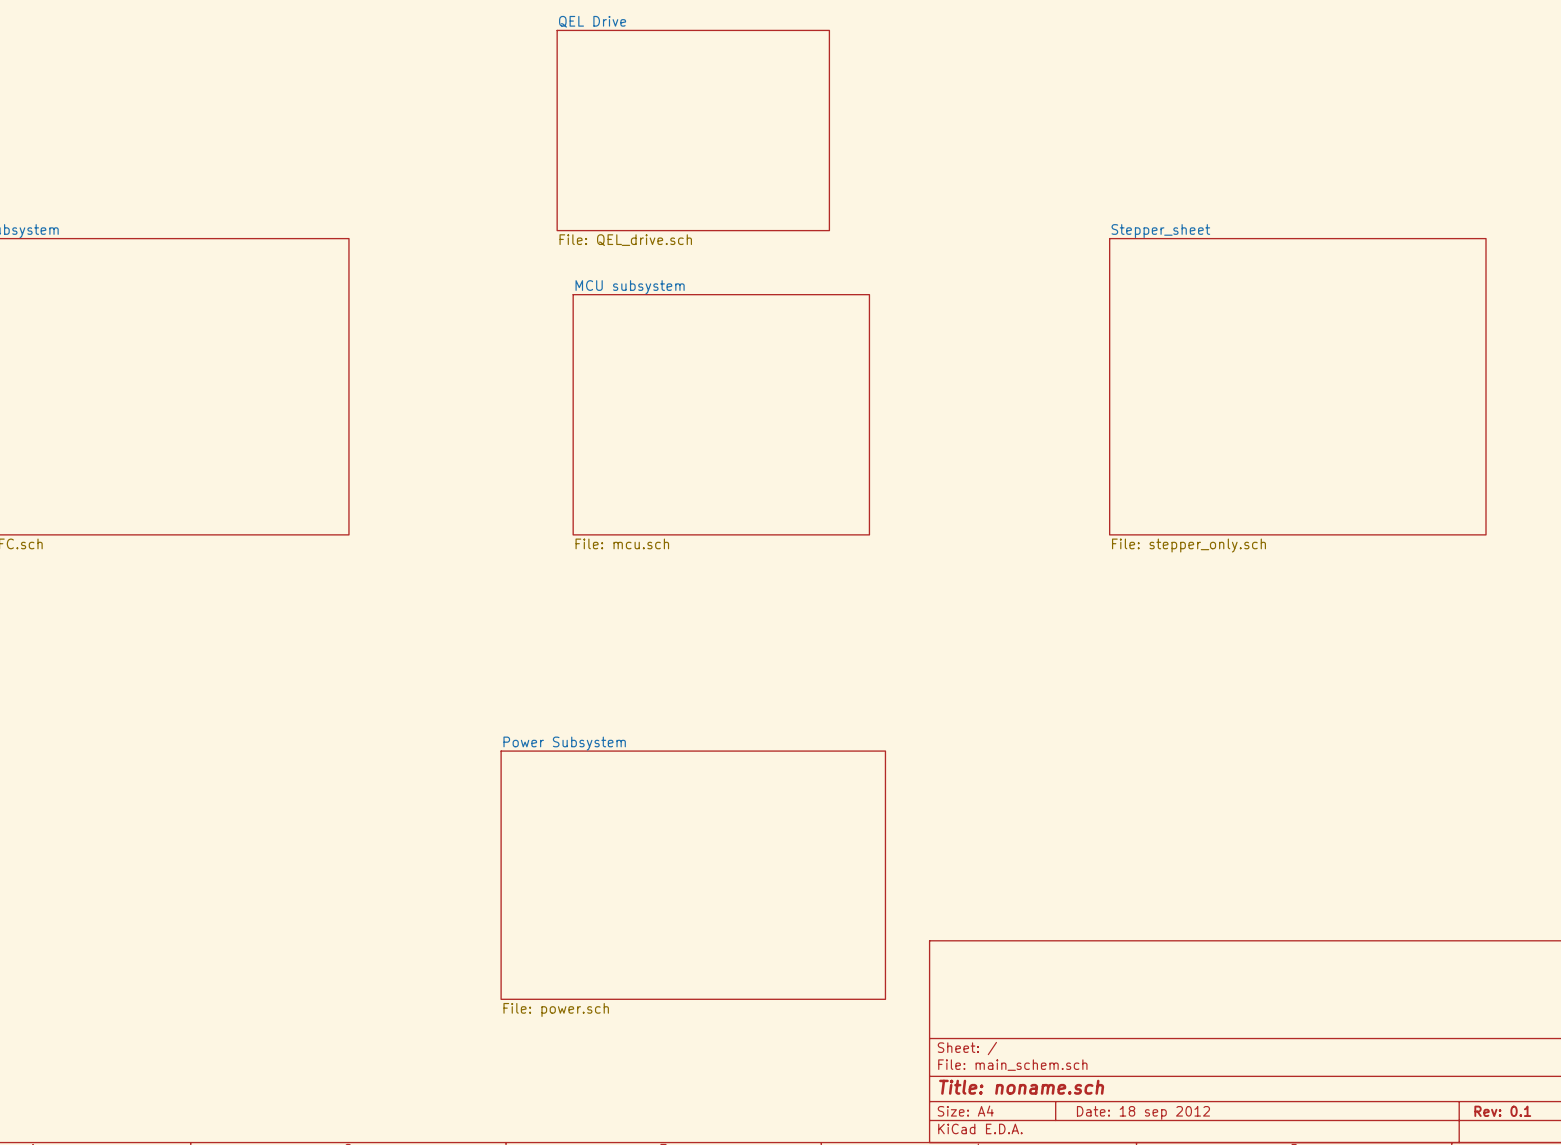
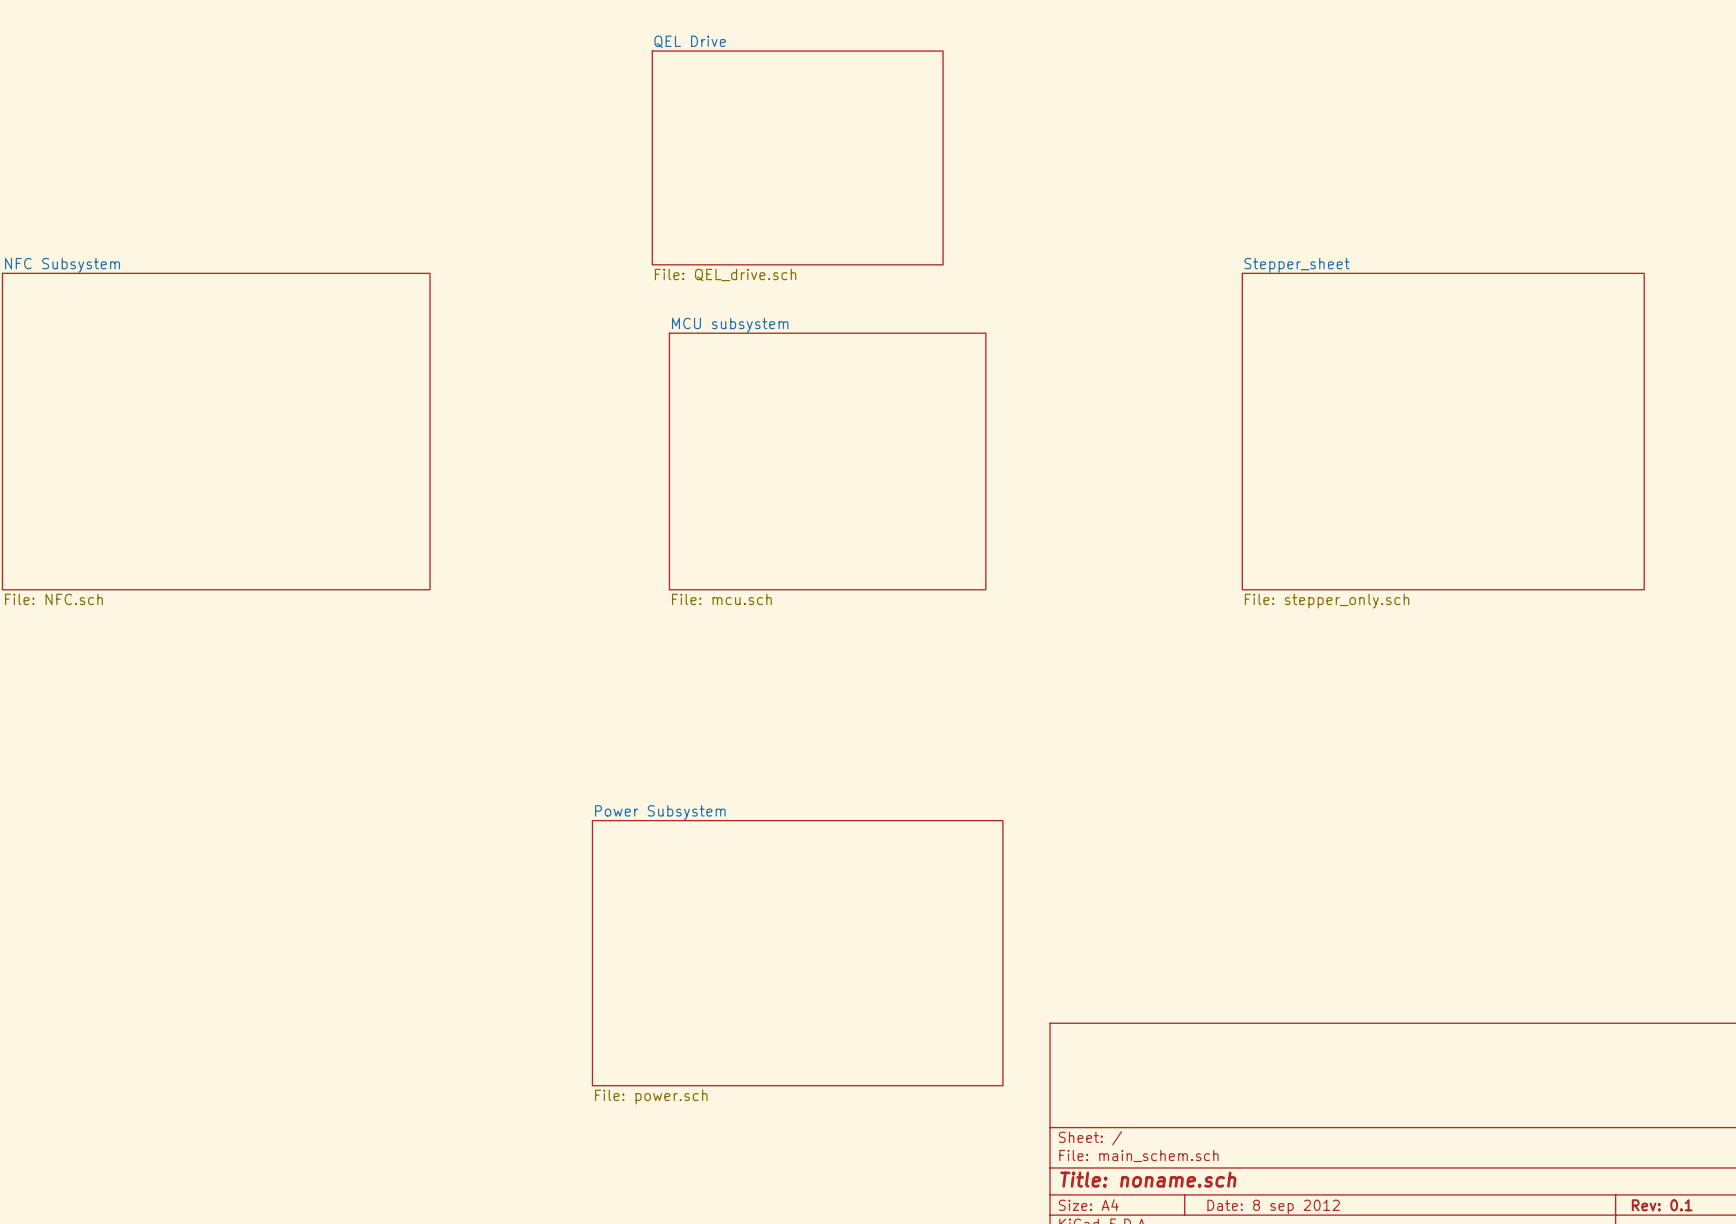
title block: Date: 18 sep 2012 (1143, 1112) -> Date: 8 sep 2012 (1273, 1207)

